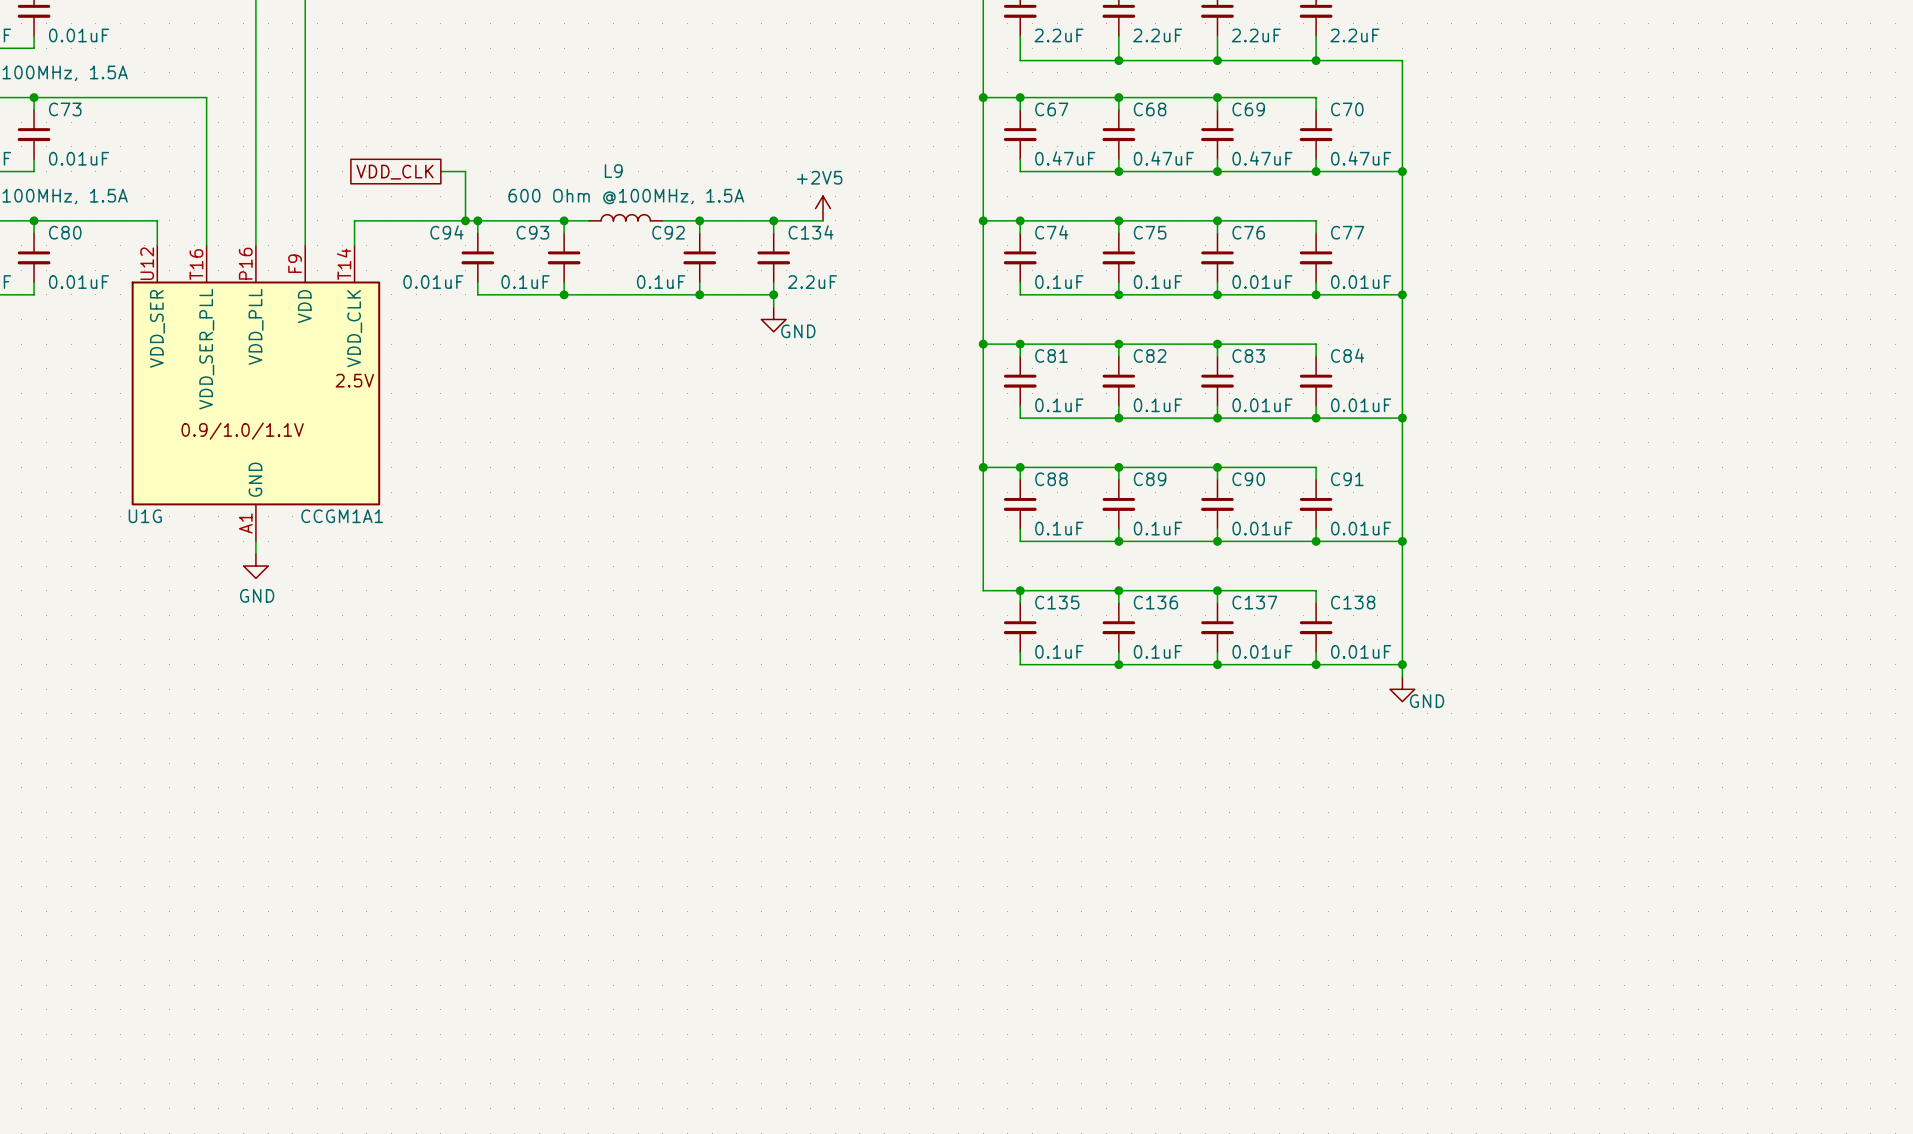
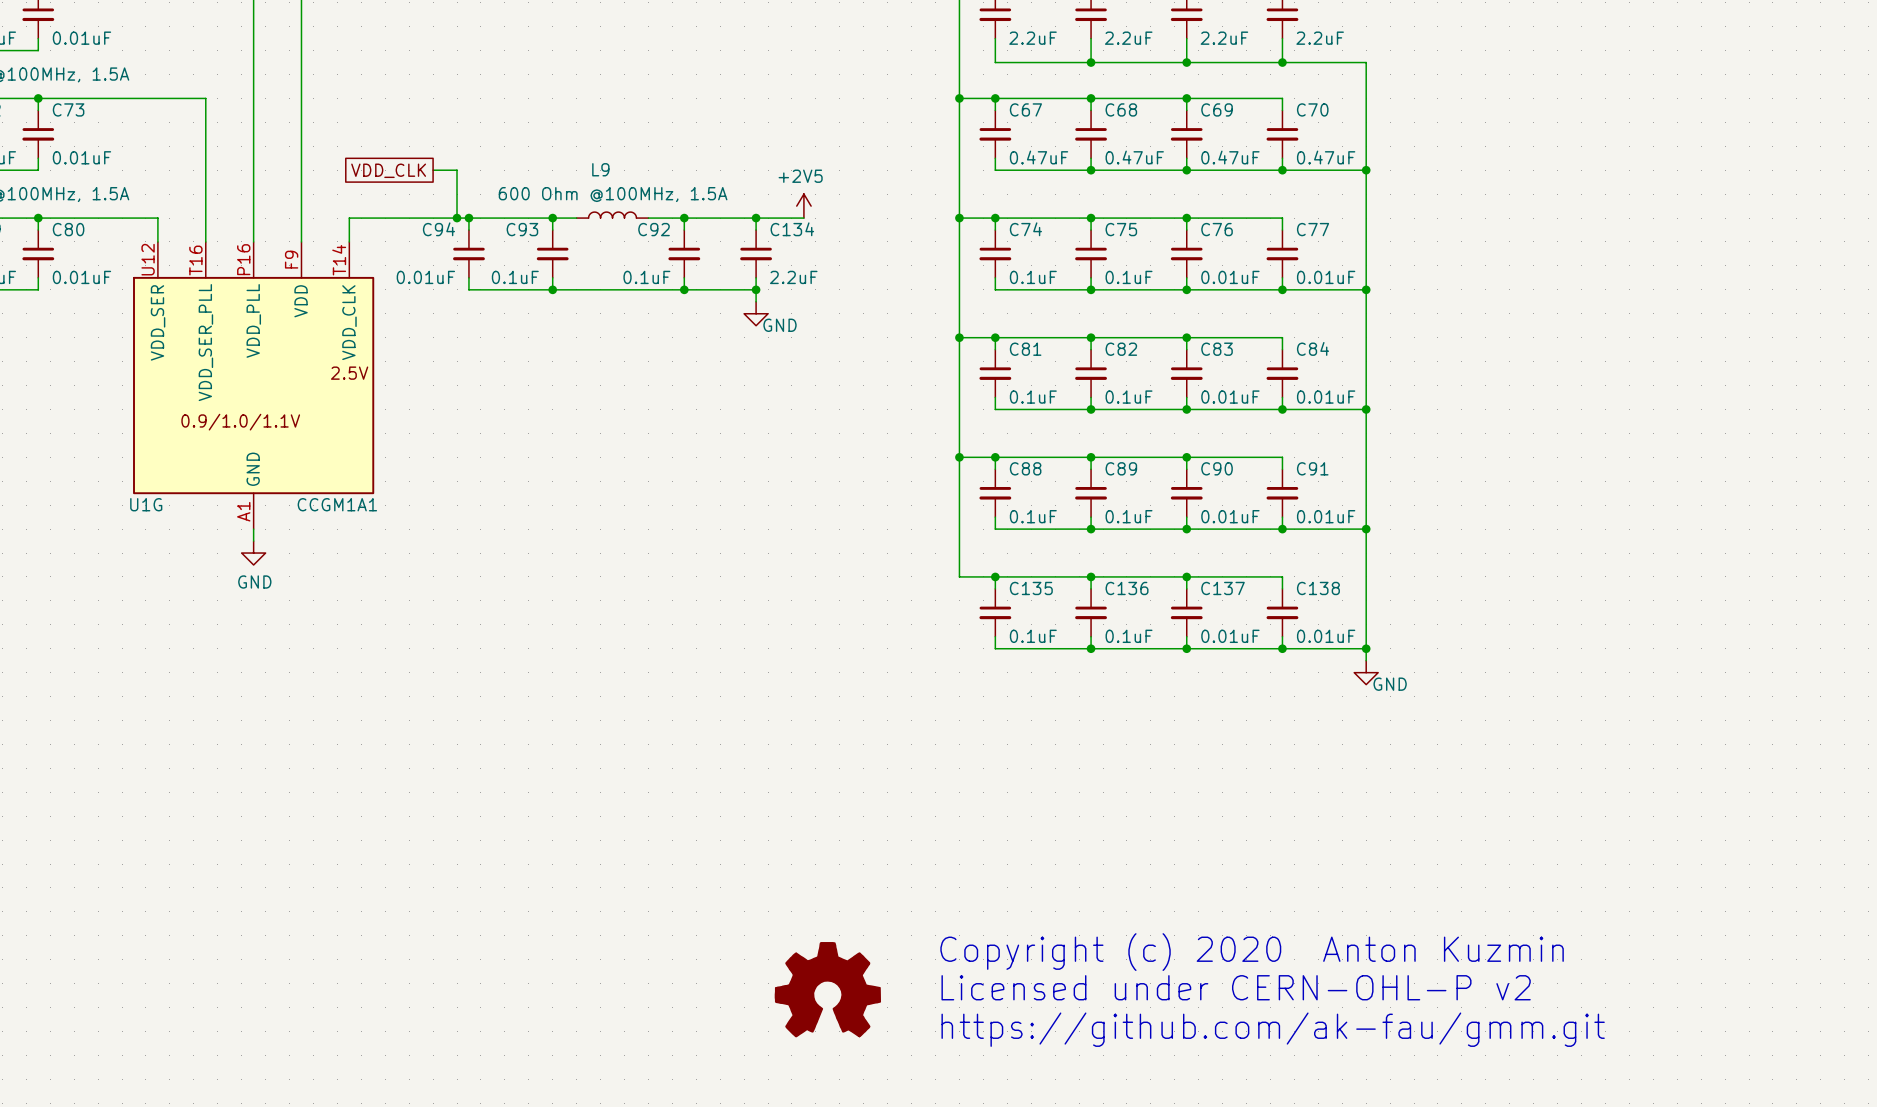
text: none -> Copyright (c) 2020 Anton Kuzmin (1252, 952)
text: none -> Licensed under CERN-OHL-P v2 (1236, 987)
power symbol: none -> (827, 989)
text: none -> https://github.com/ak-fau/gmm.git (1273, 1029)

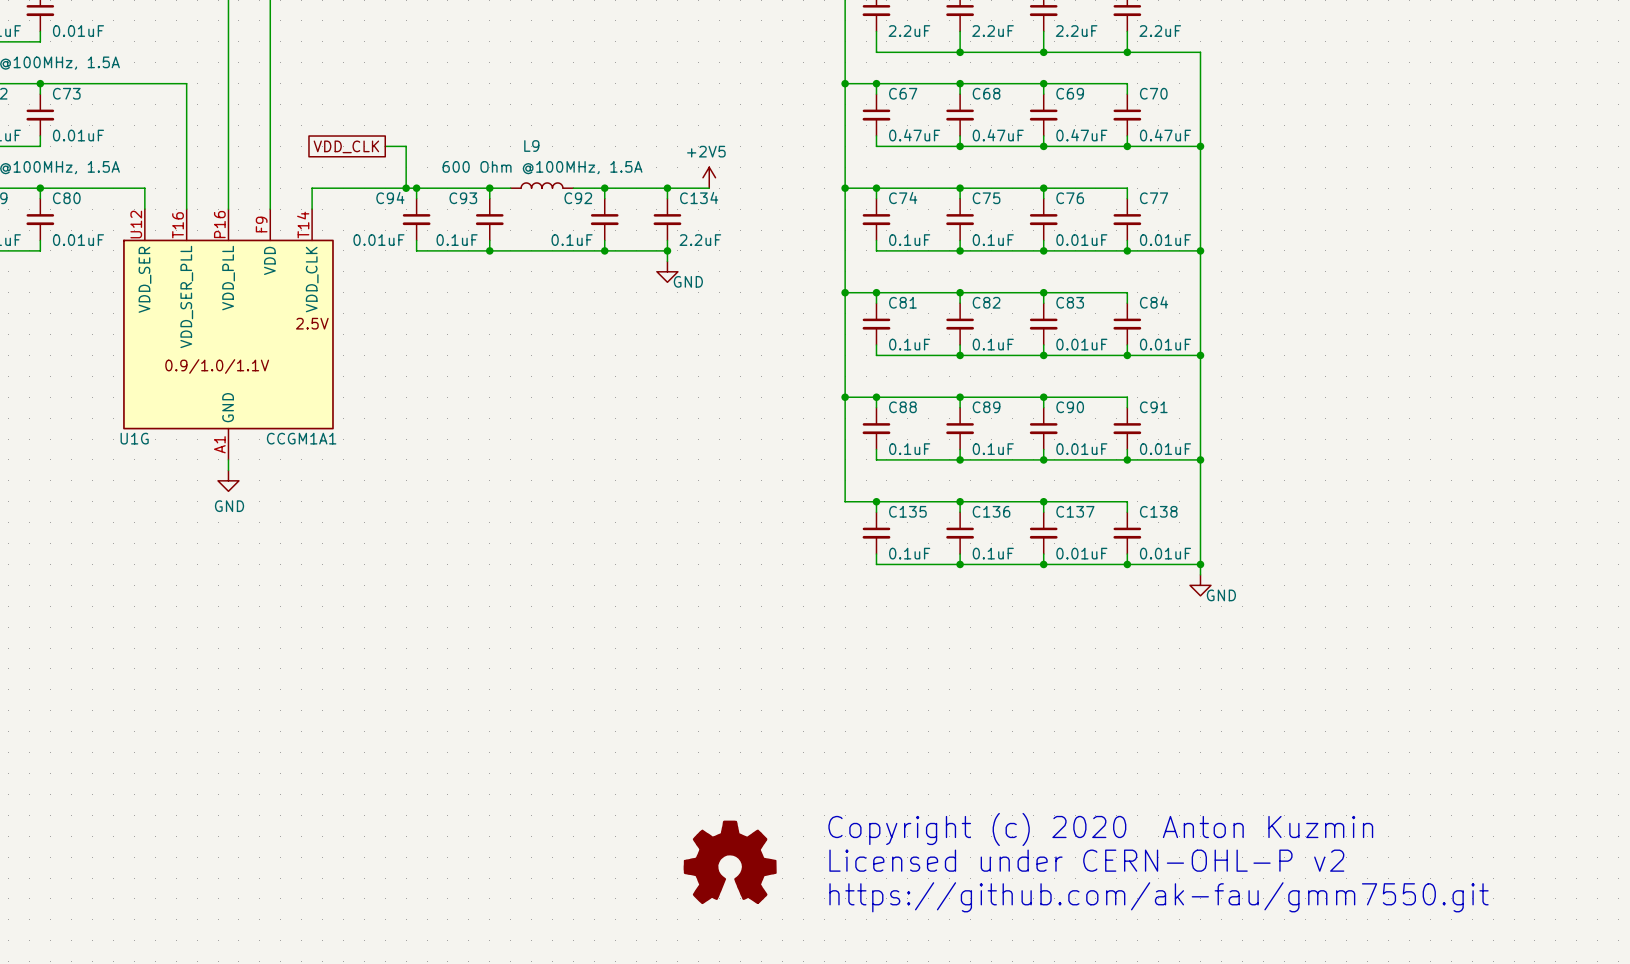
text: https://github.com/ak-fau/gmm.git (1273, 1029) -> https://github.com/ak-fau/gmm7550.git (1159, 897)

